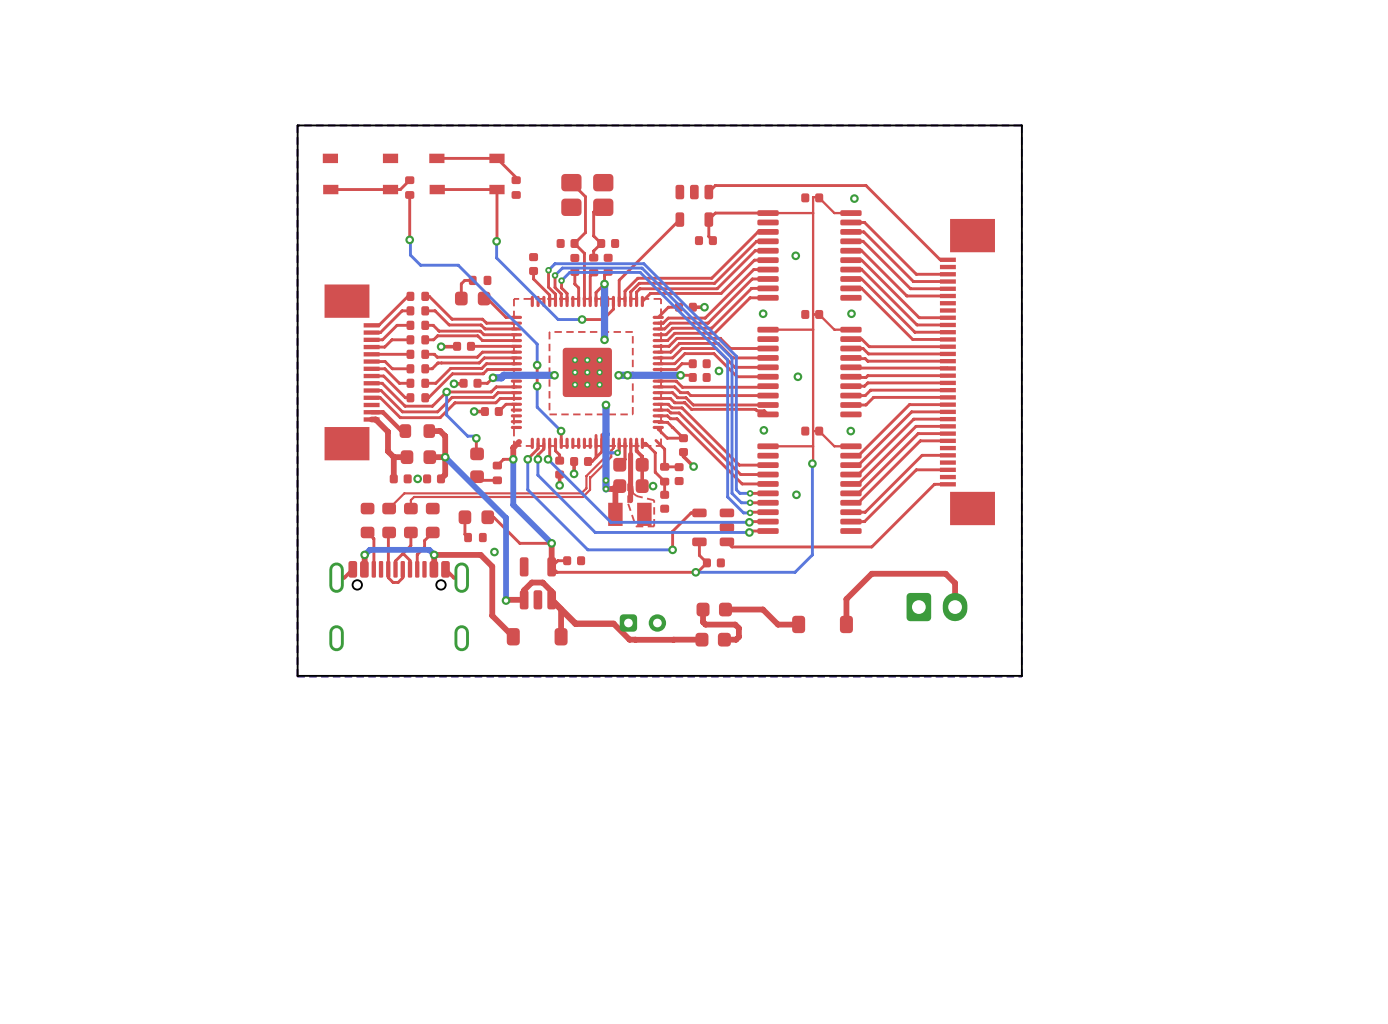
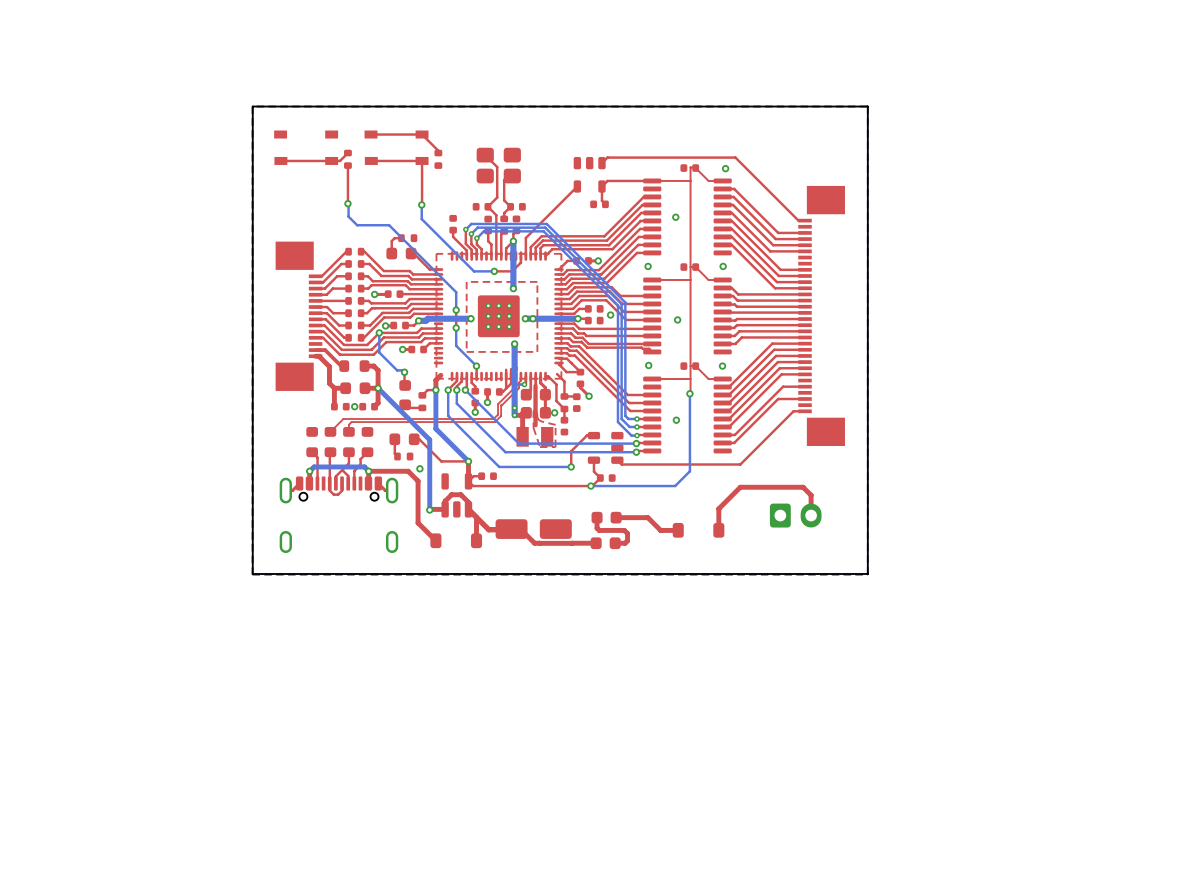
part: none -> (533, 529)
part: (642, 623) -> none

